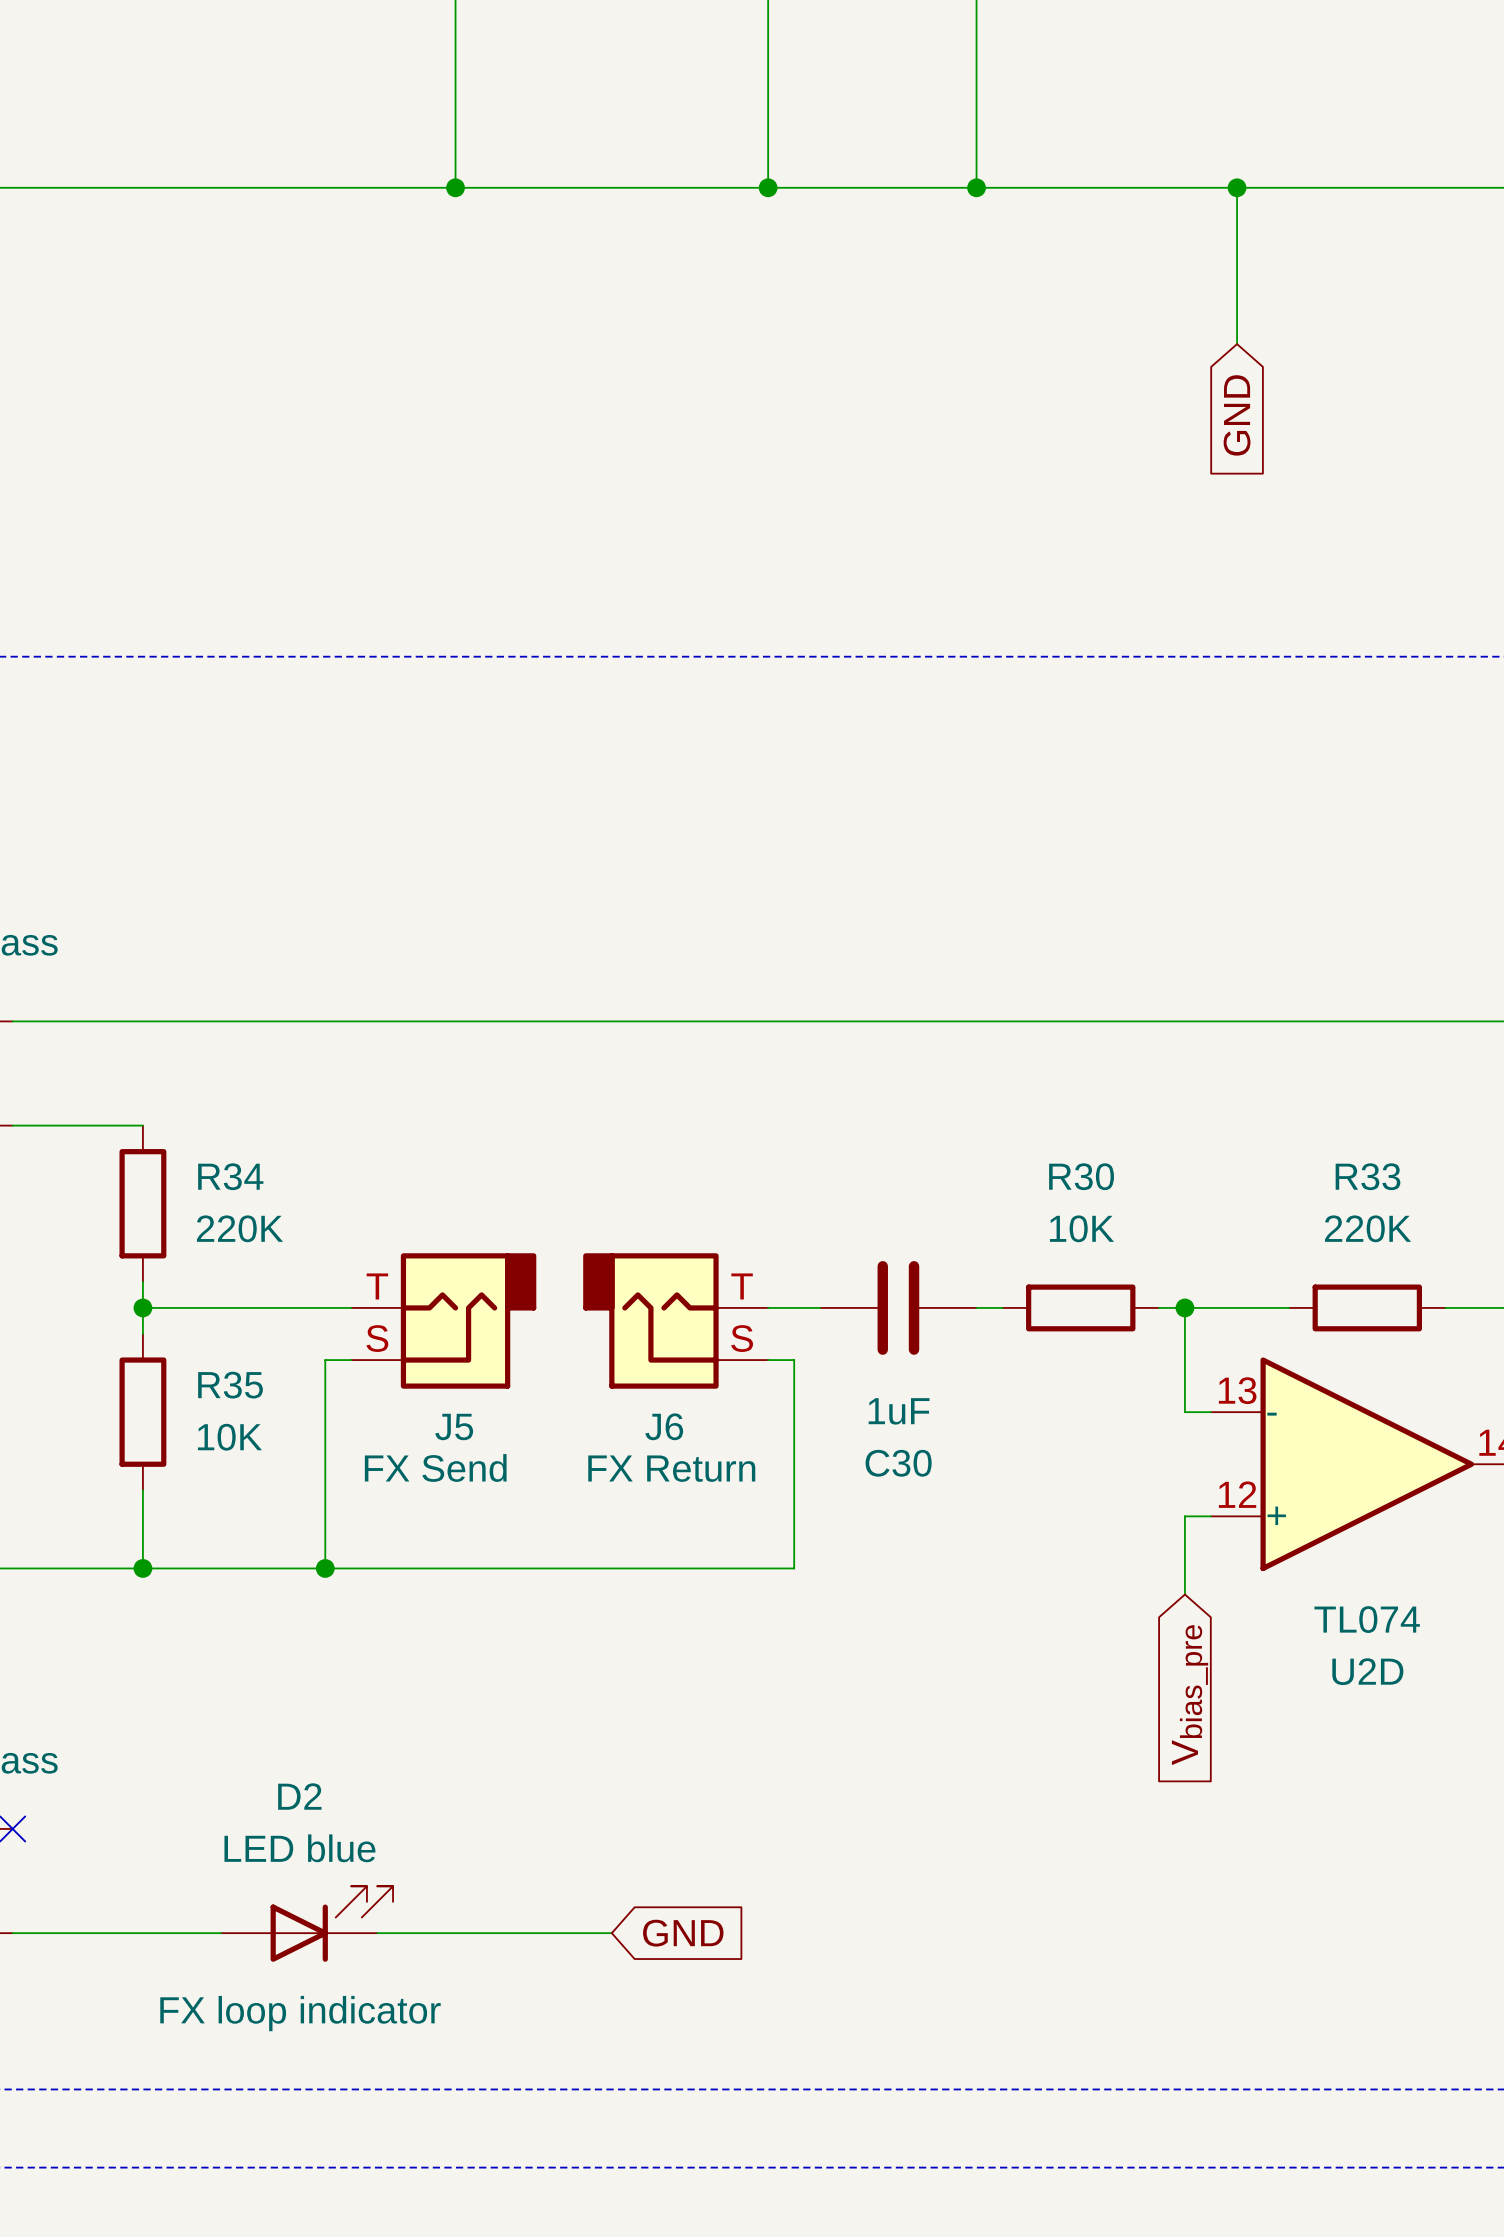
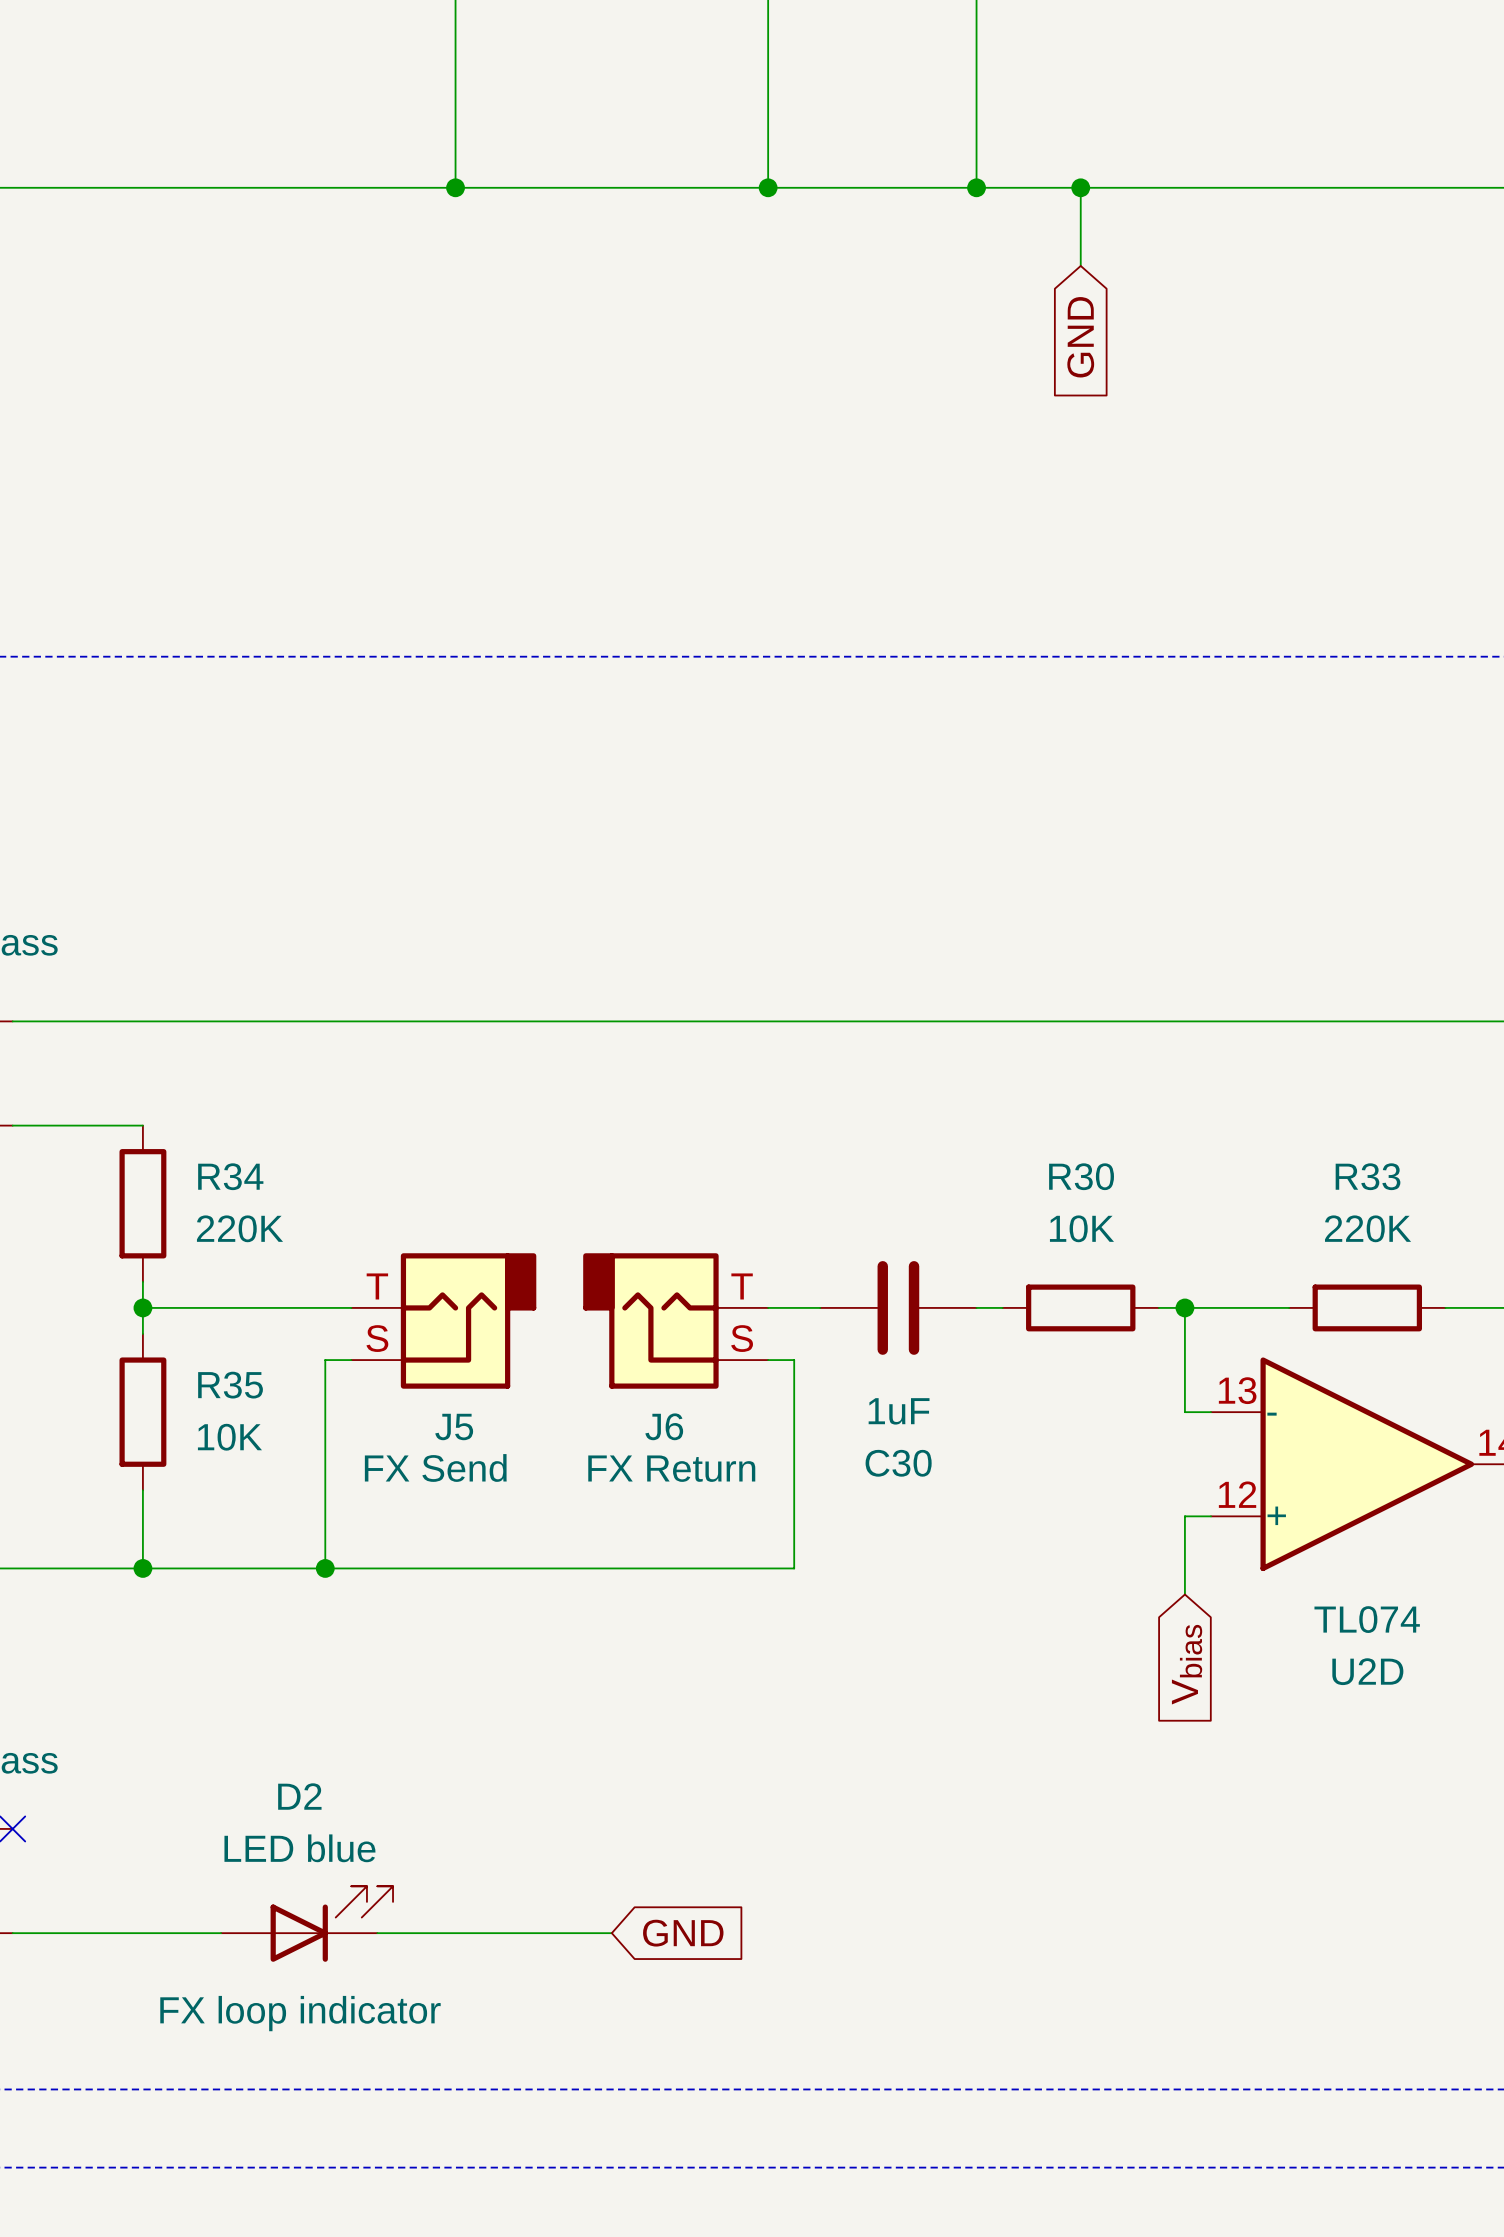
wire: none -> (1080, 187) (1080, 265)
junction: none -> (1080, 187)
wire: (1237, 187) (1237, 344) -> none
junction: (1237, 187) -> none
global label position: GND (1237, 415) -> GND (1080, 337)
global label: Vbias_pre (1190, 1695) -> Vbias (1187, 1664)

